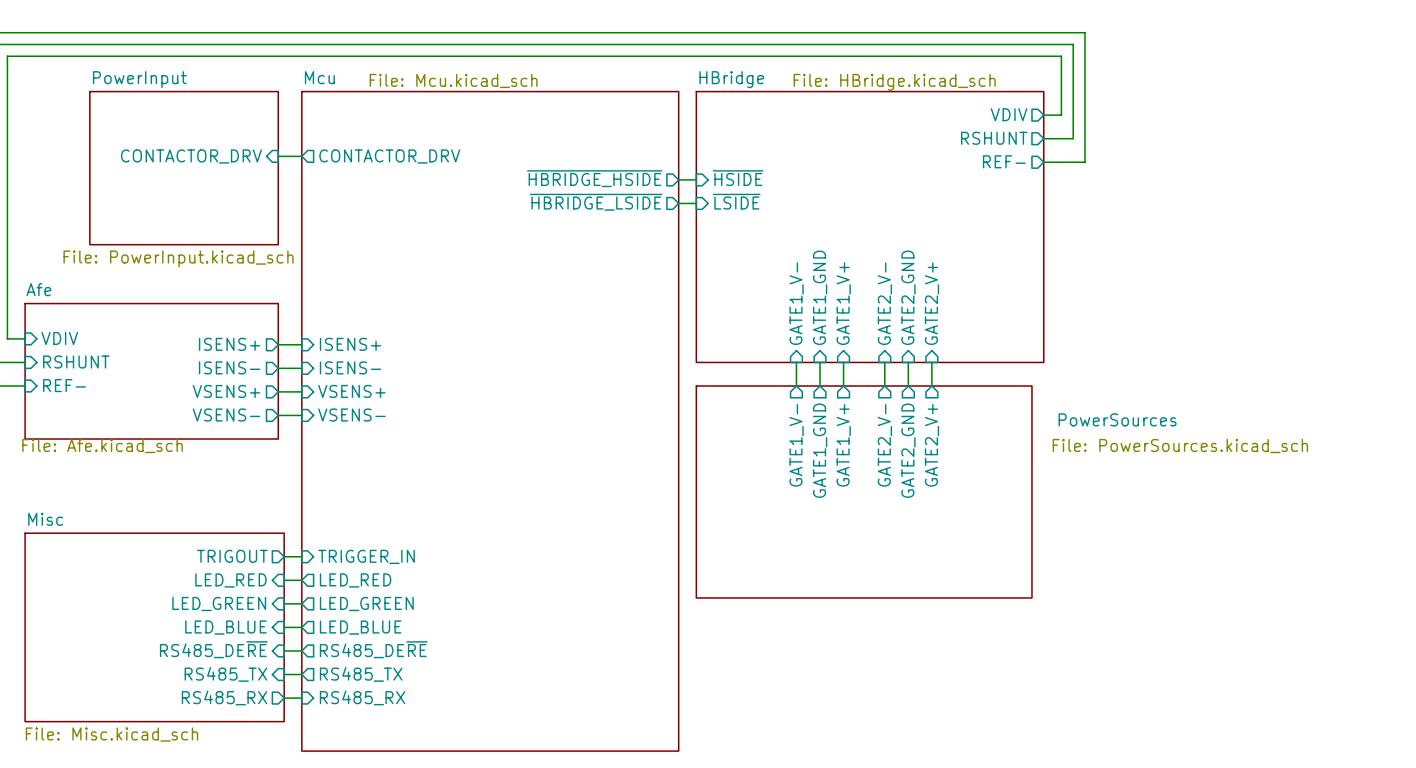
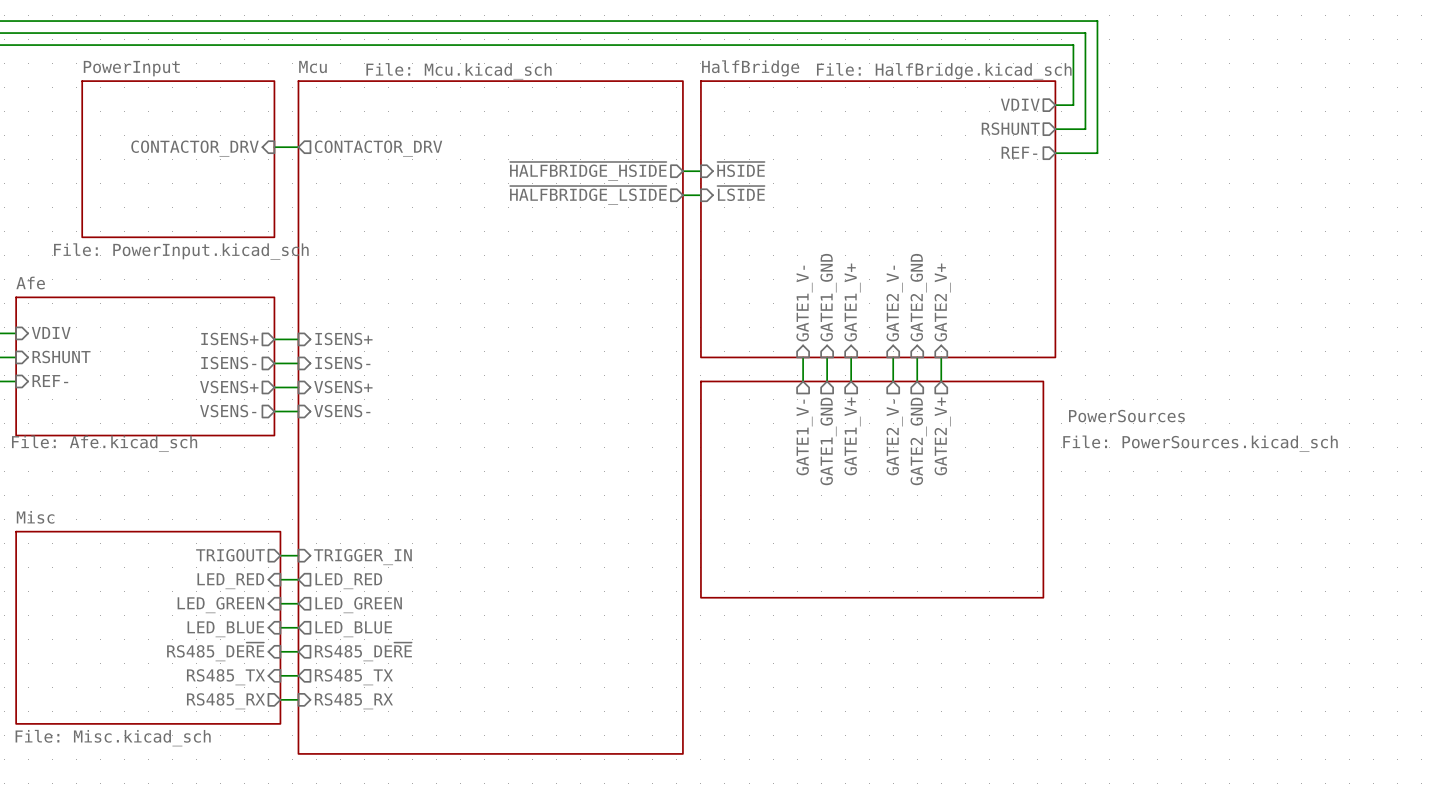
sheet HBridge name: HBridge (731, 79) -> HalfBridge (750, 68)
sheet HBridge value: File: HBridge.kicad_sch (894, 82) -> File: HalfBridge.kicad_sch (944, 71)
sheet pin: ~{HBRIDGE_HSIDE} (594, 178) -> ~{HALFBRIDGE_HSIDE} (588, 171)
sheet pin: ~{HBRIDGE_LSIDE} (596, 202) -> ~{HALFBRIDGE_LSIDE} (588, 195)

